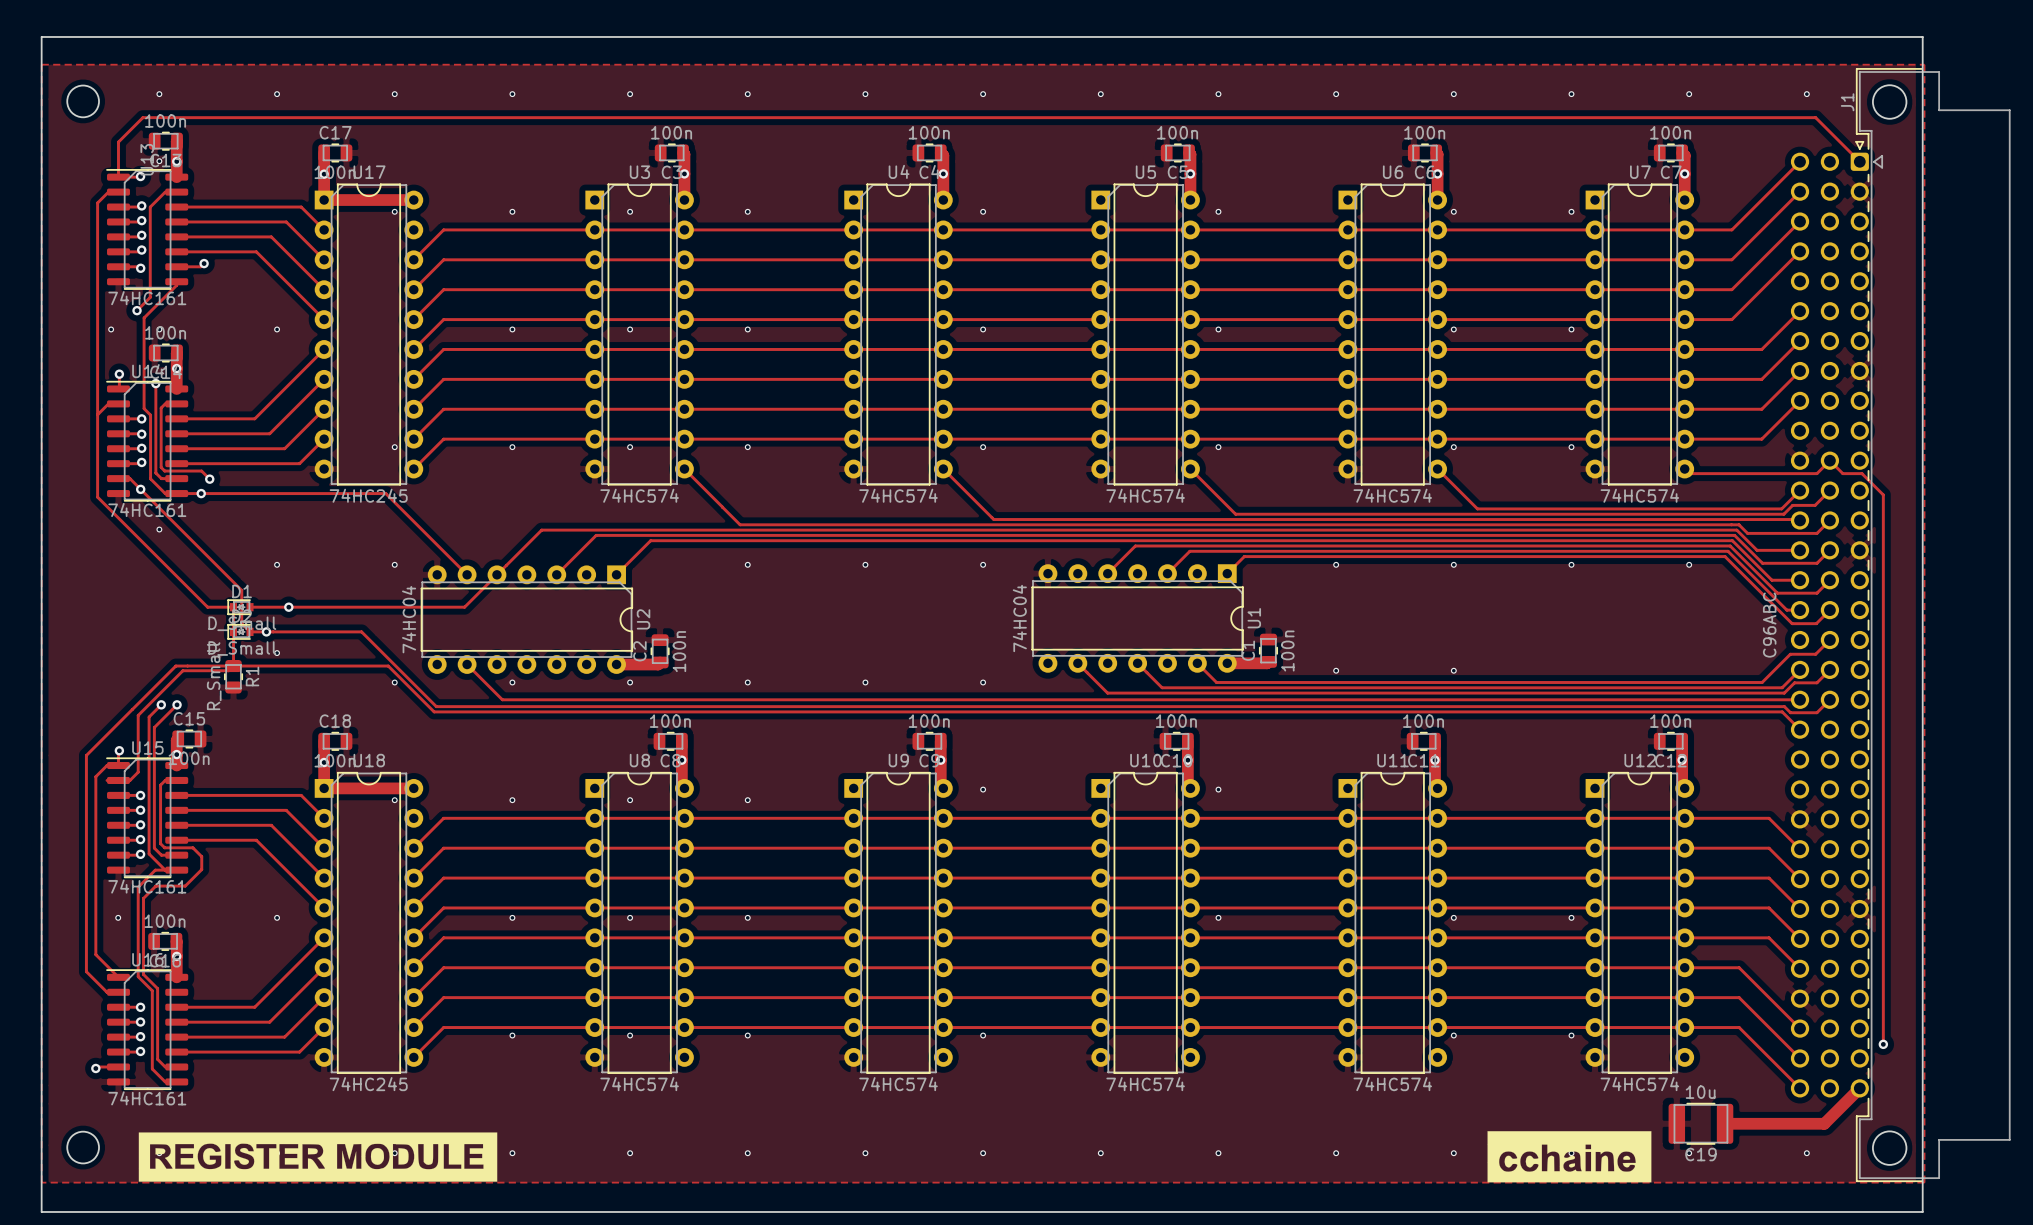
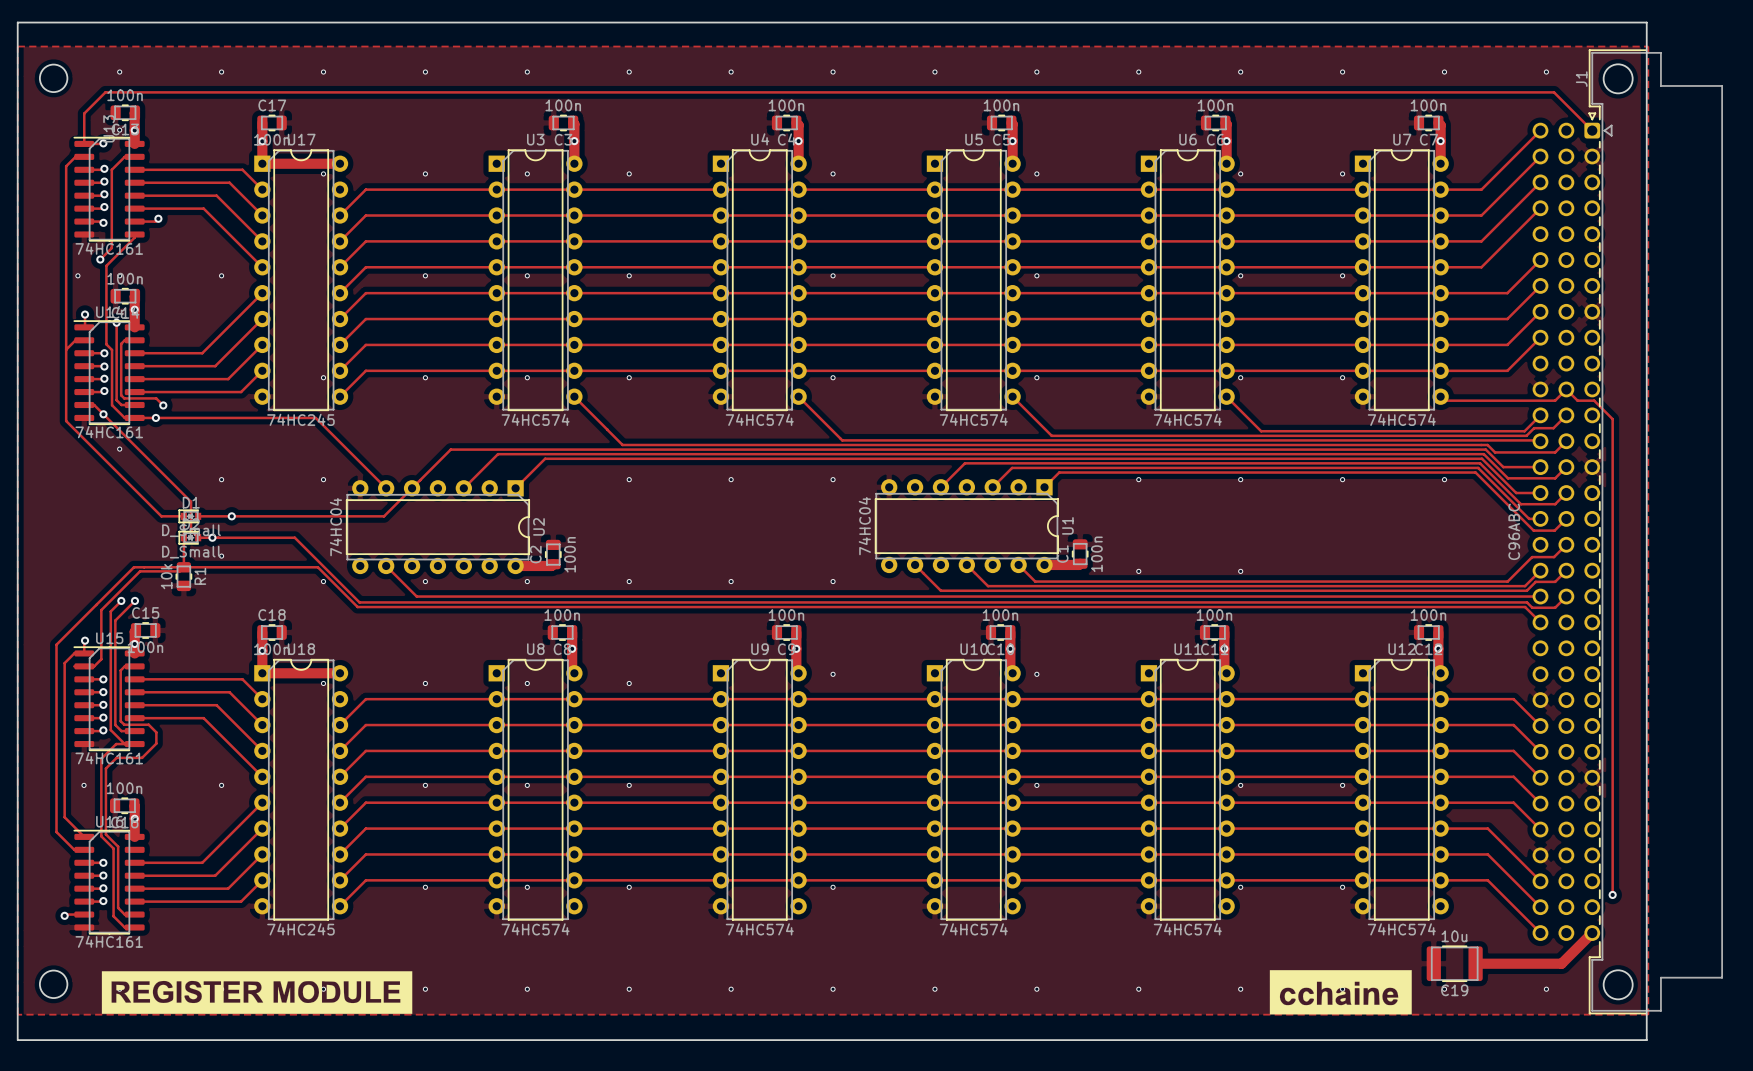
R1 value: R_Small (214, 676) -> 10k (166, 576)

